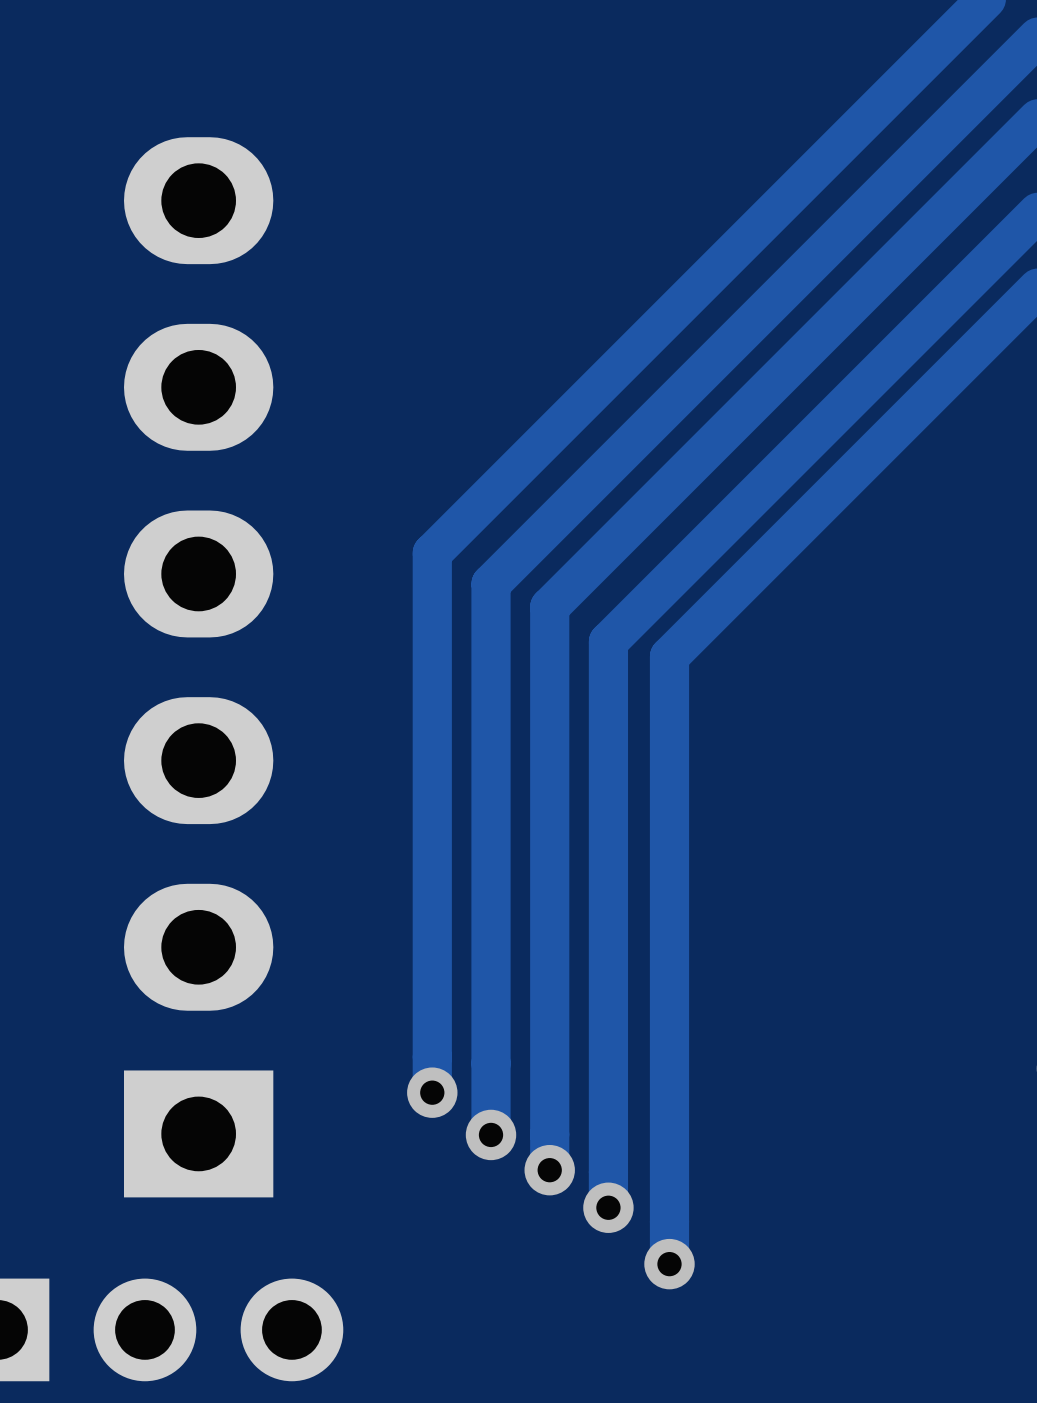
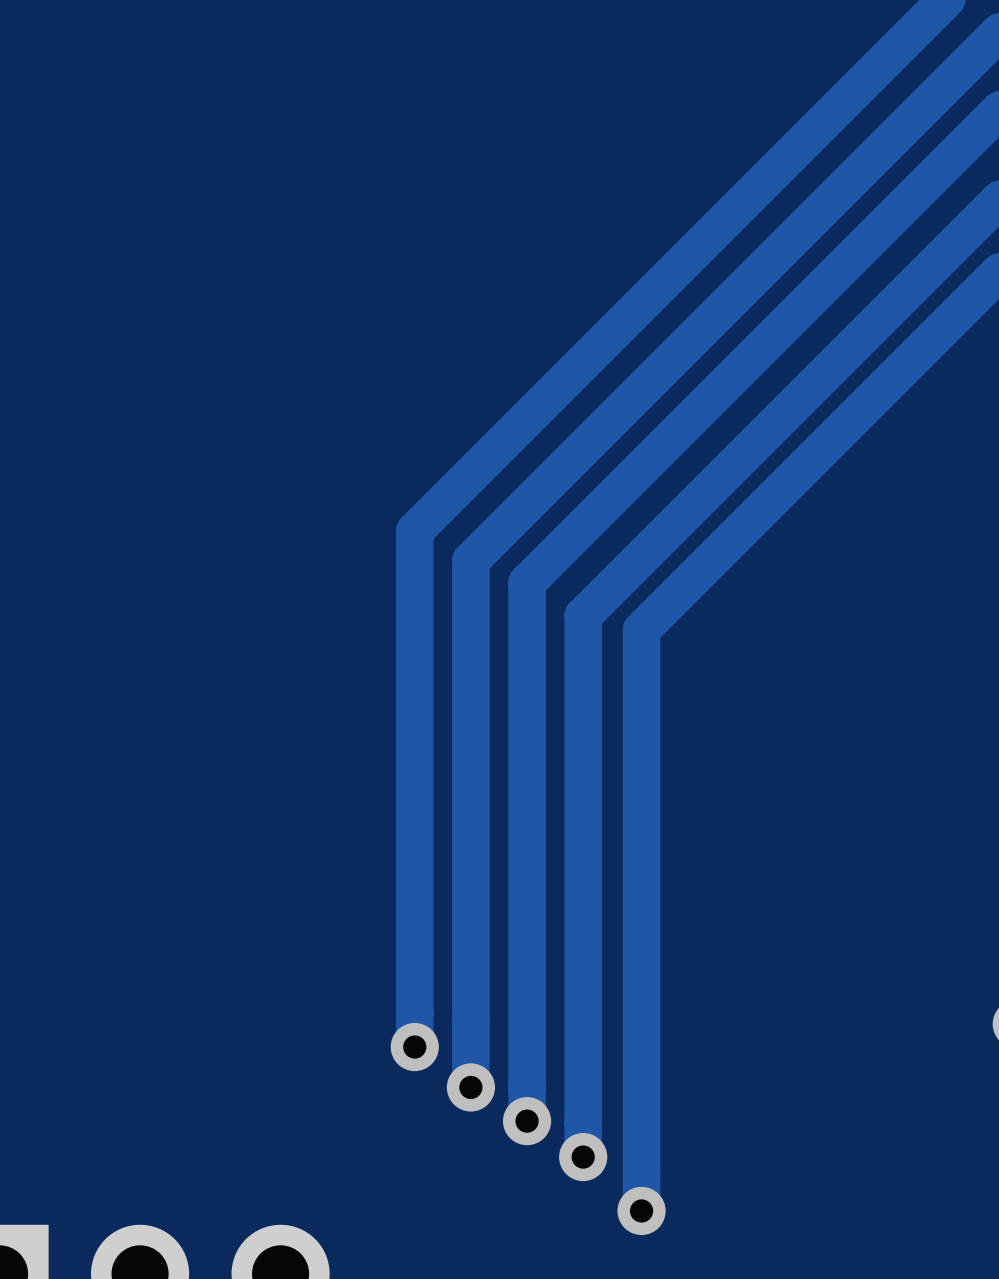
part: (198, 667) -> none

